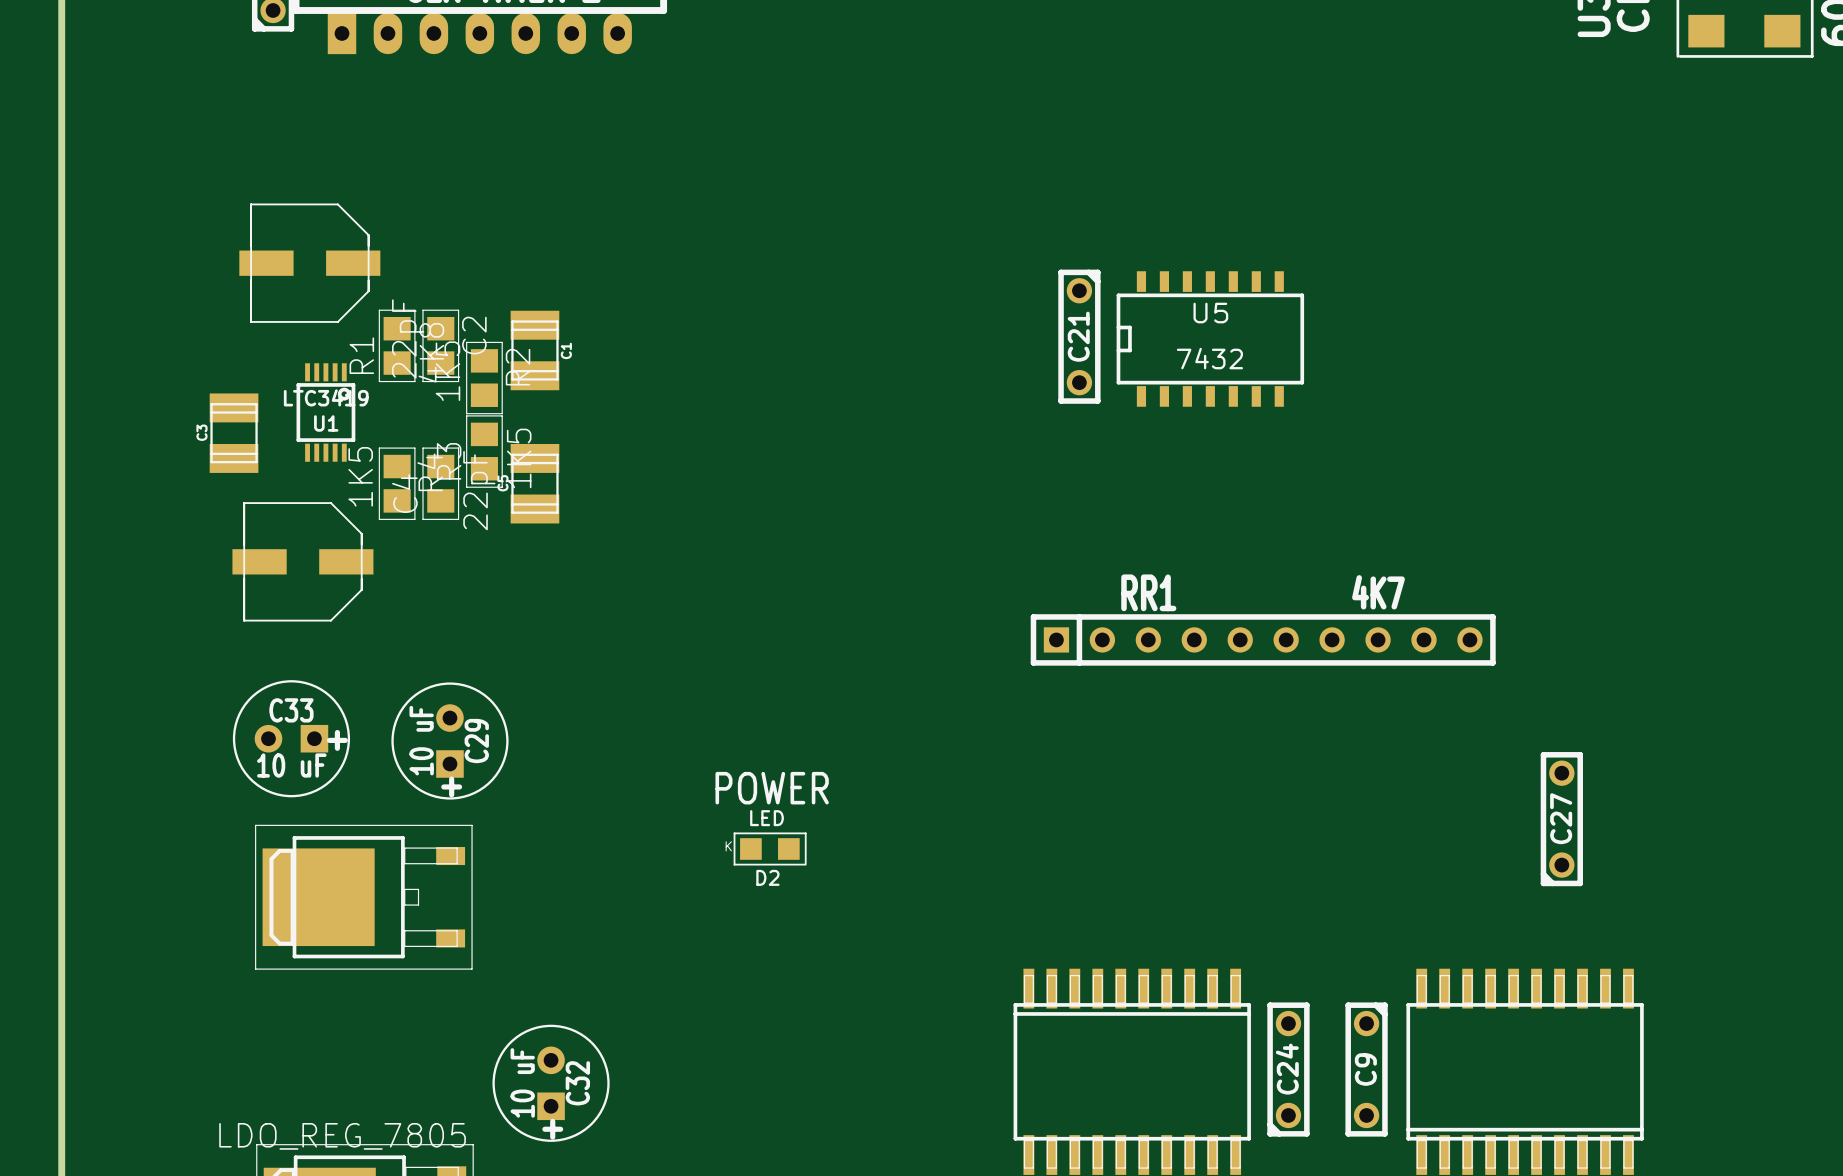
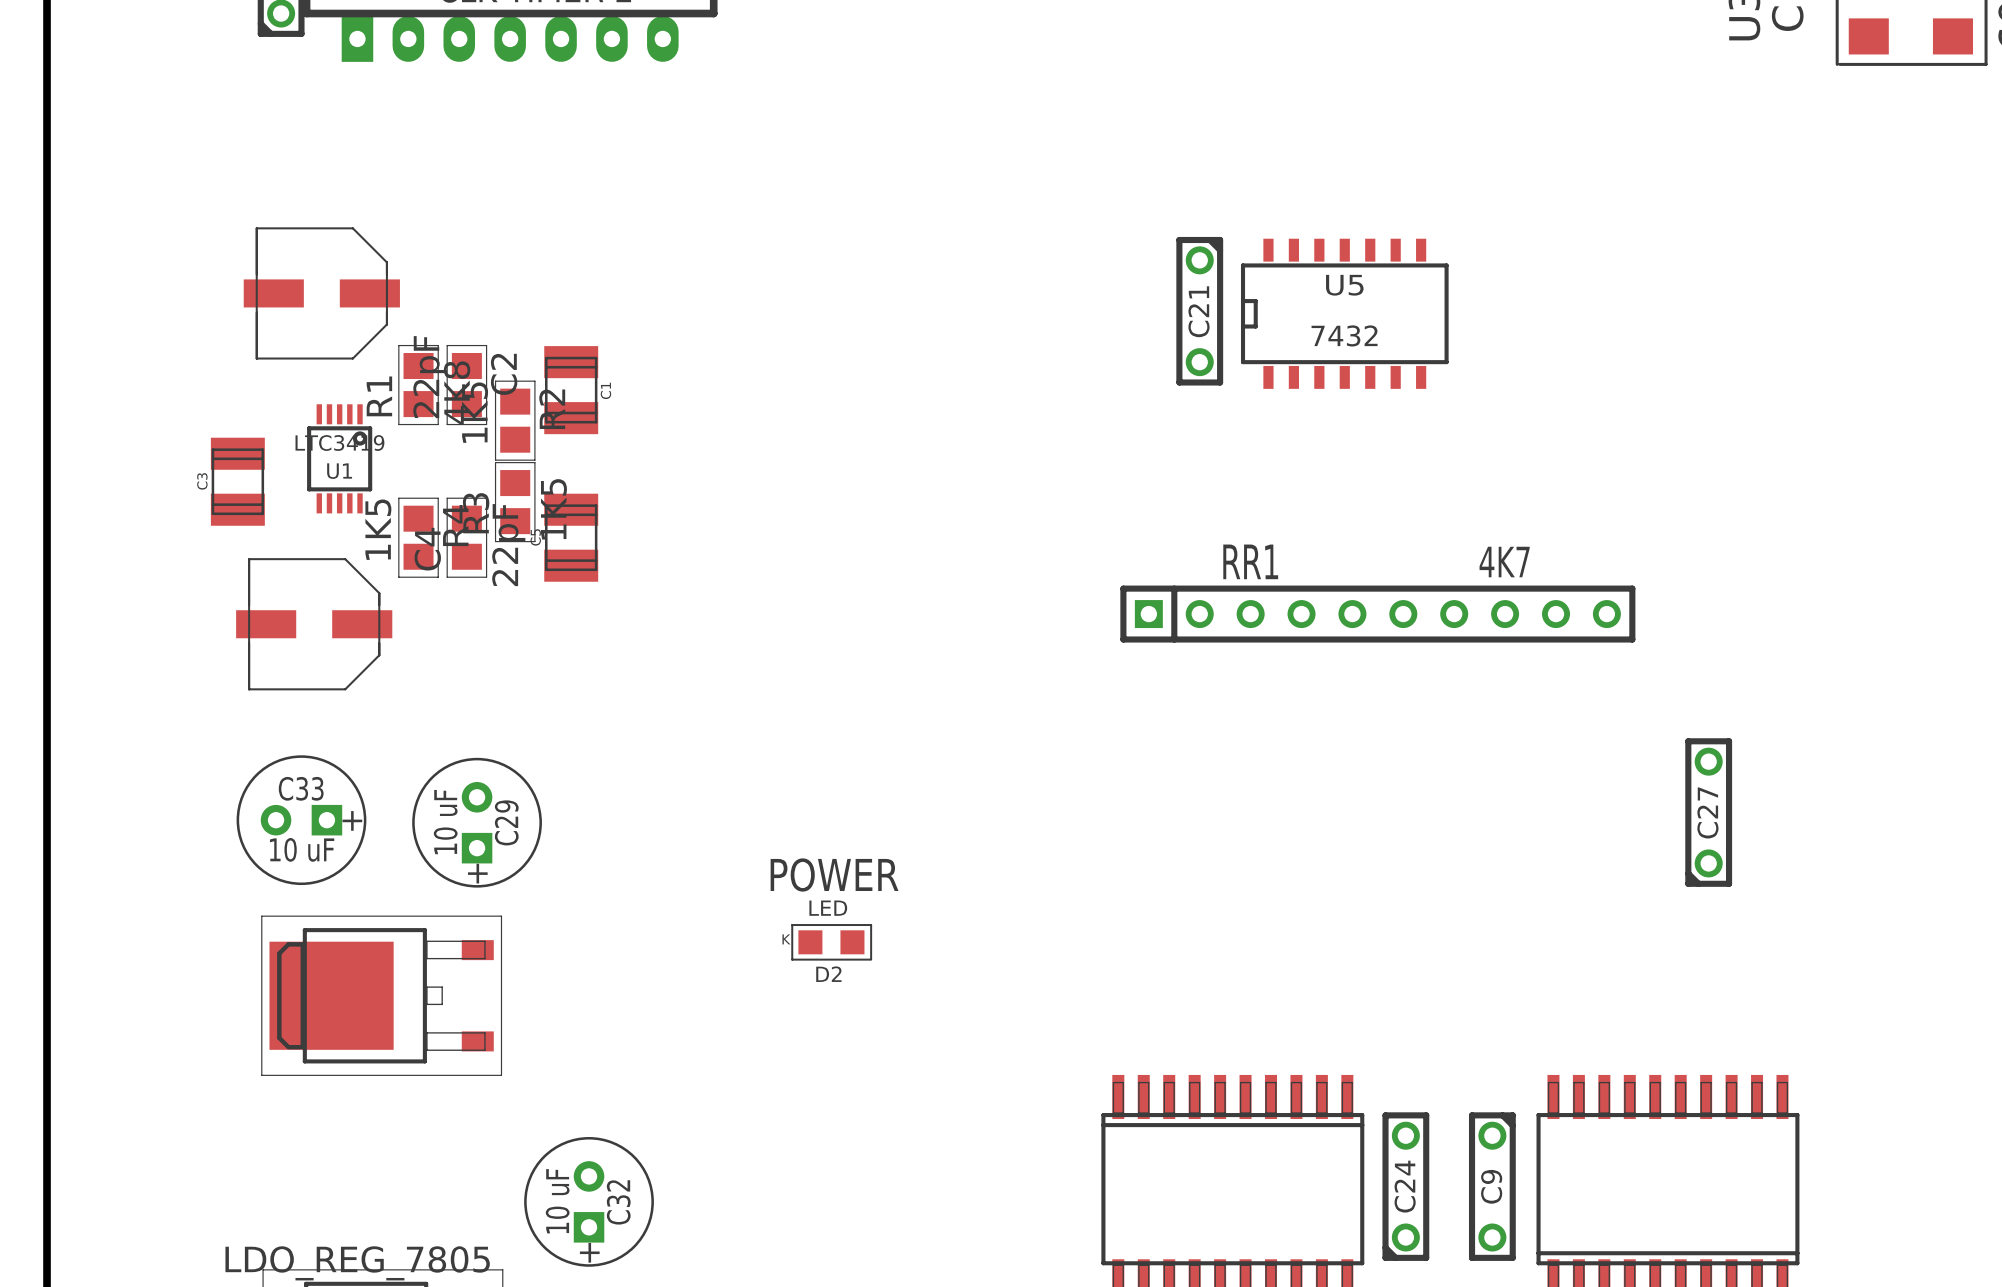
C21 position: (1079, 336) -> (1199, 311)
U5 position: (1210, 339) -> (1344, 313)
RR1 position: (1263, 639) -> (1377, 614)
C27 position: (1561, 819) -> (1708, 812)

